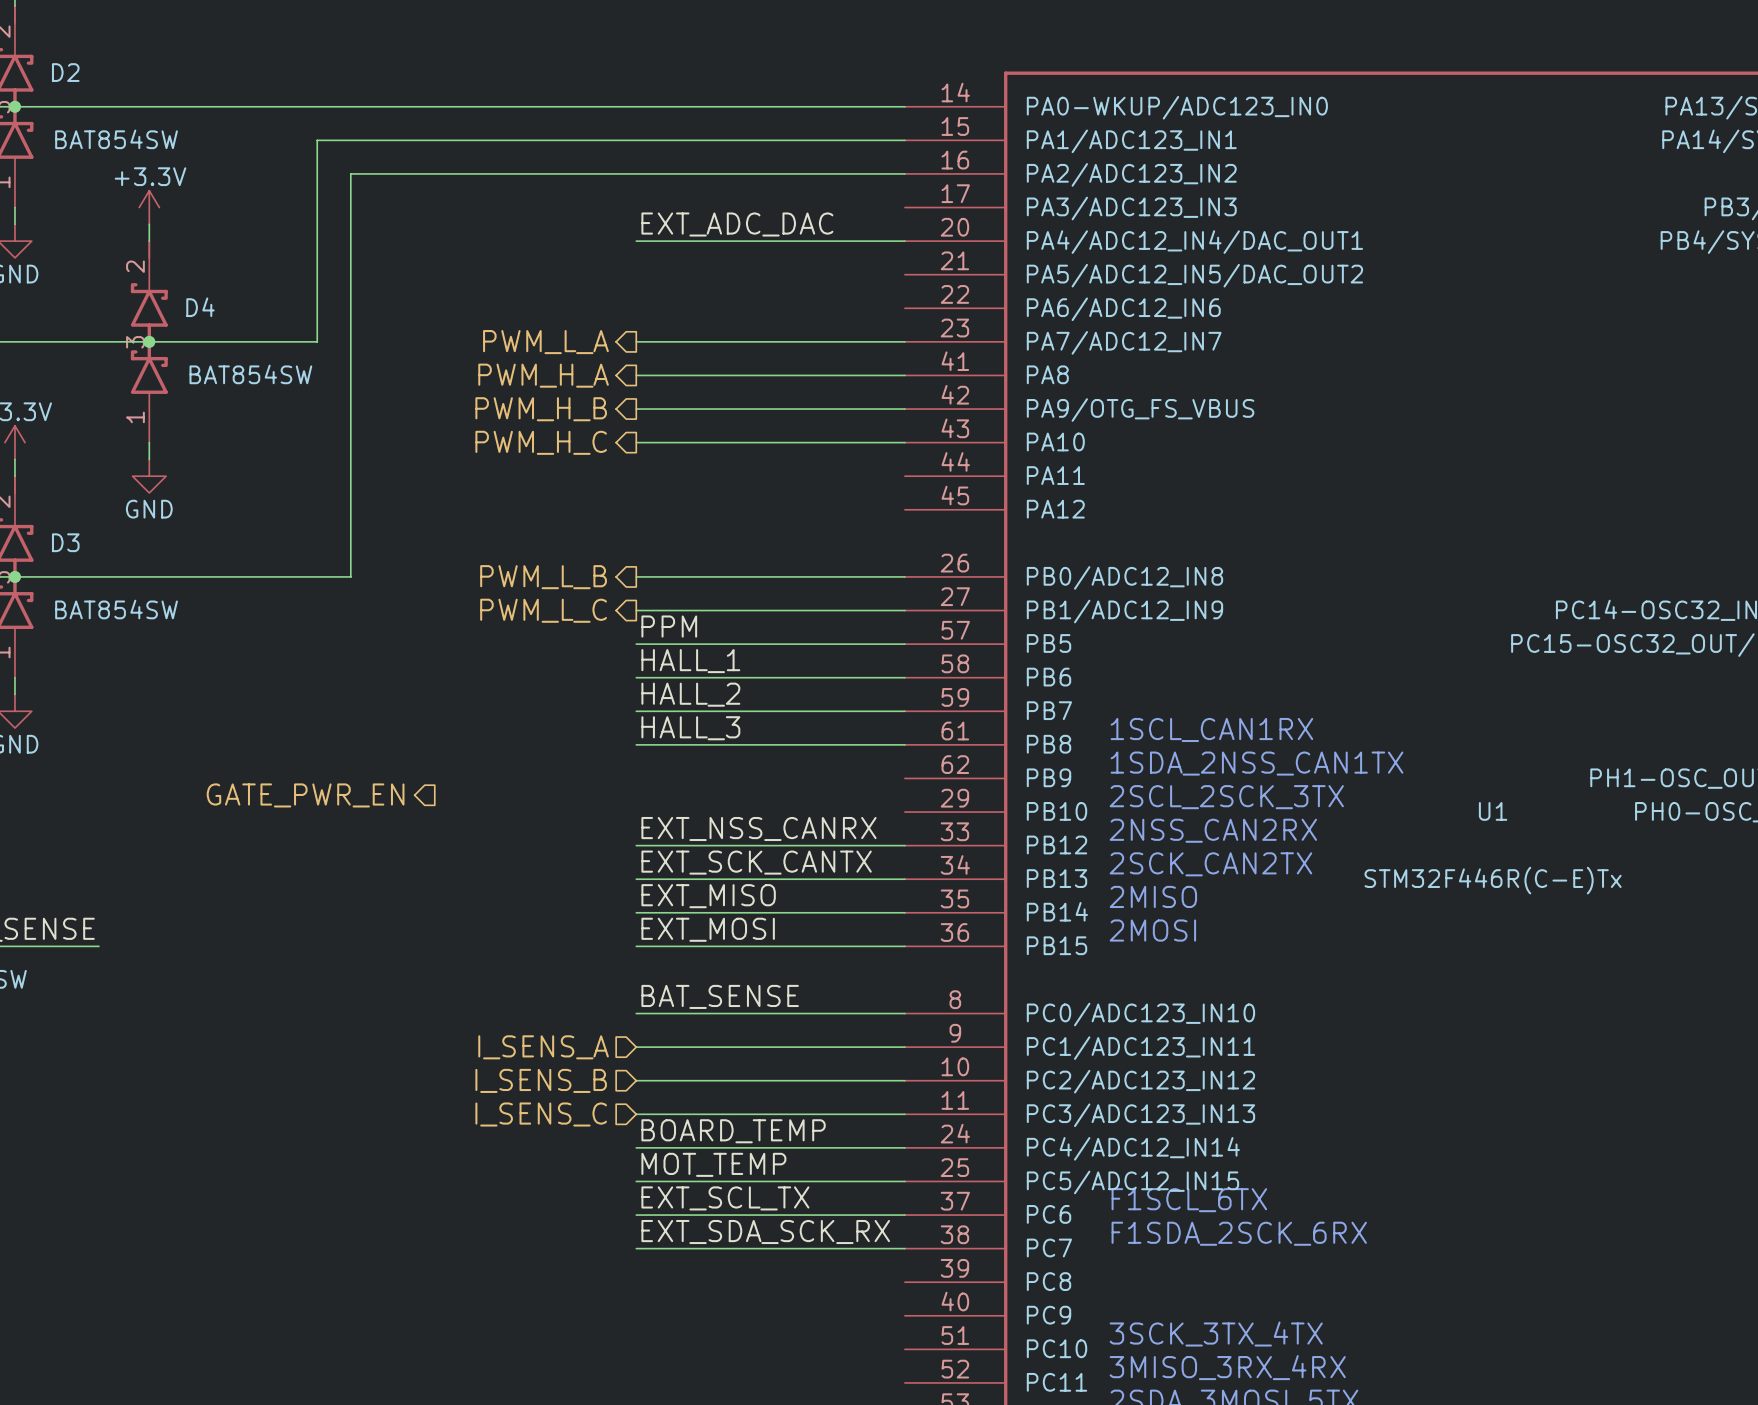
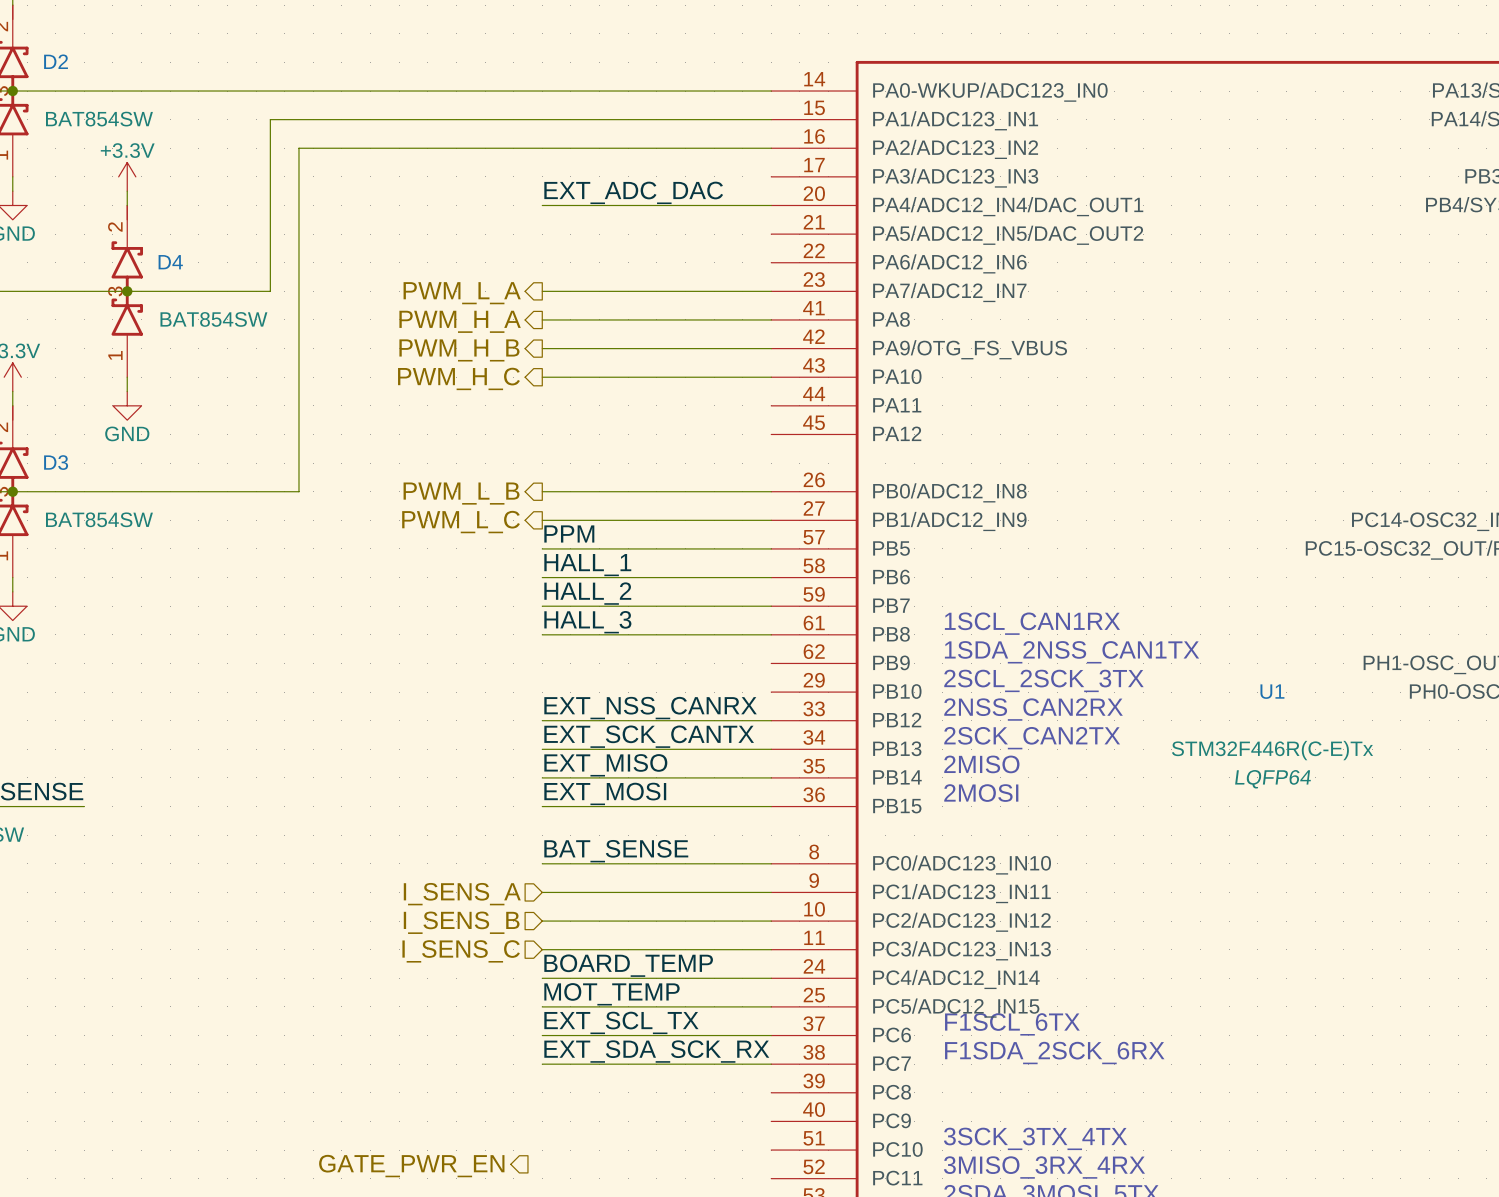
hierarchical label: GATE_PWR_EN (305, 795) -> none
U1 text: none -> LQFP64 (1272, 779)
hierarchical label: none -> GATE_PWR_EN (411, 1166)

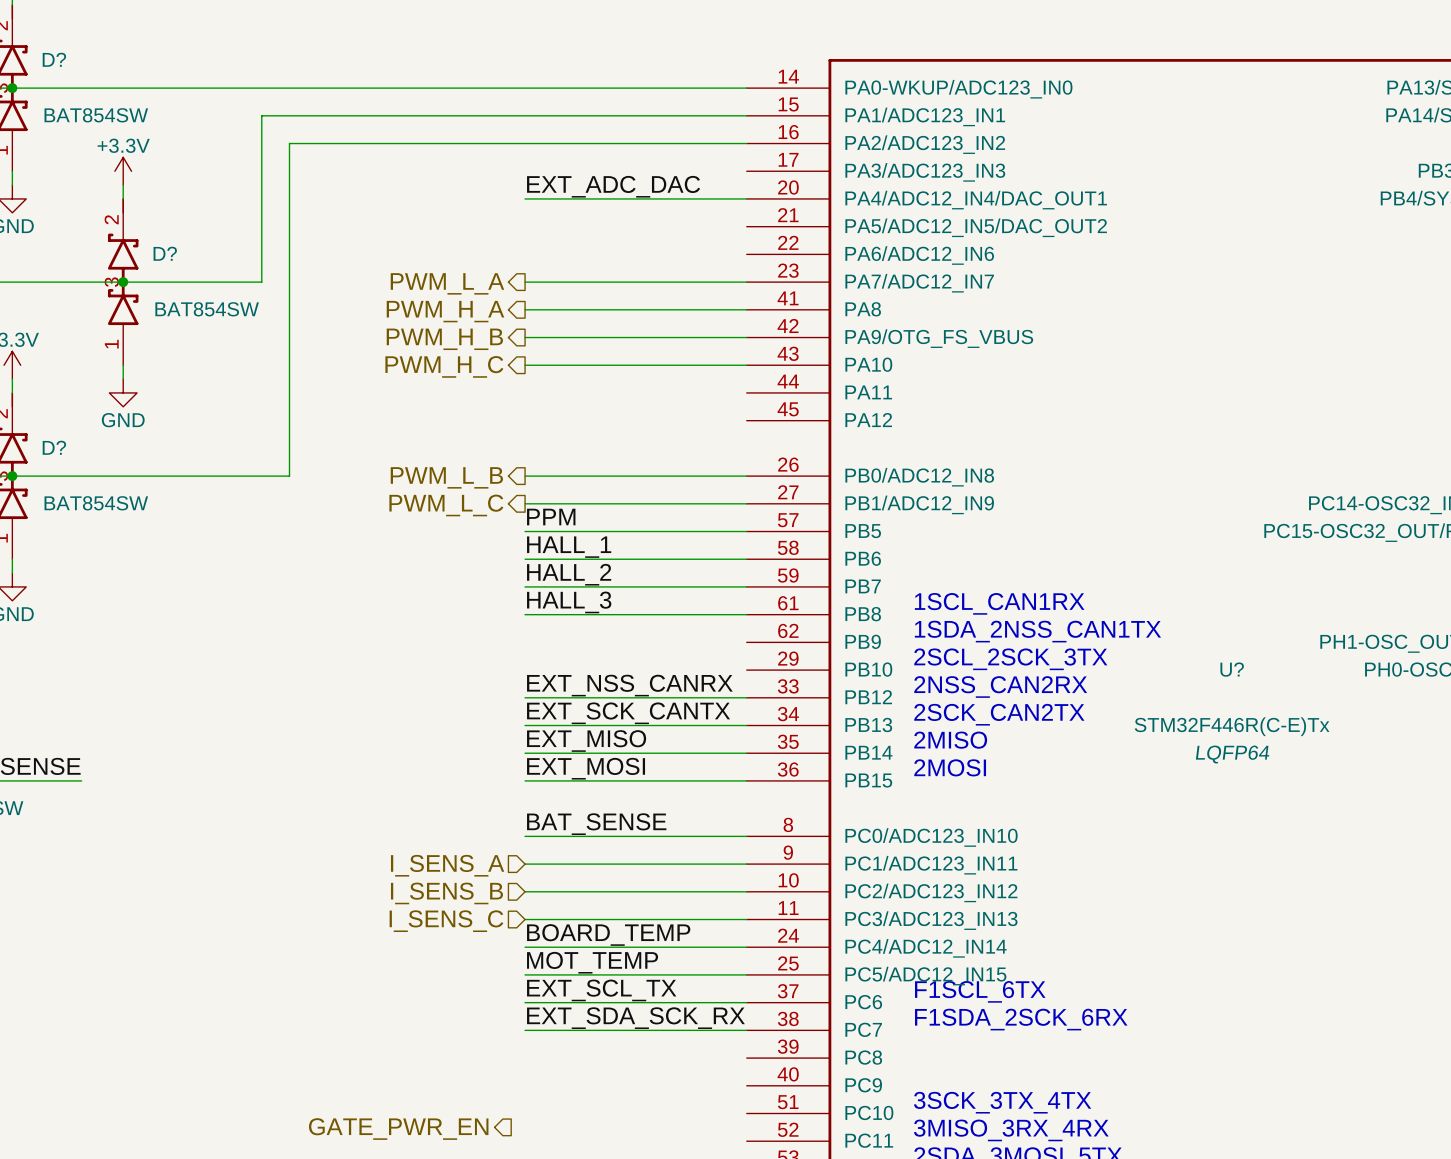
D2 name: D2 (56, 61) -> D? (54, 59)
D4 name: D4 (170, 262) -> D? (165, 253)
D3 name: D3 (56, 462) -> D? (54, 447)
U1 name: U1 (1272, 691) -> U? (1232, 669)

